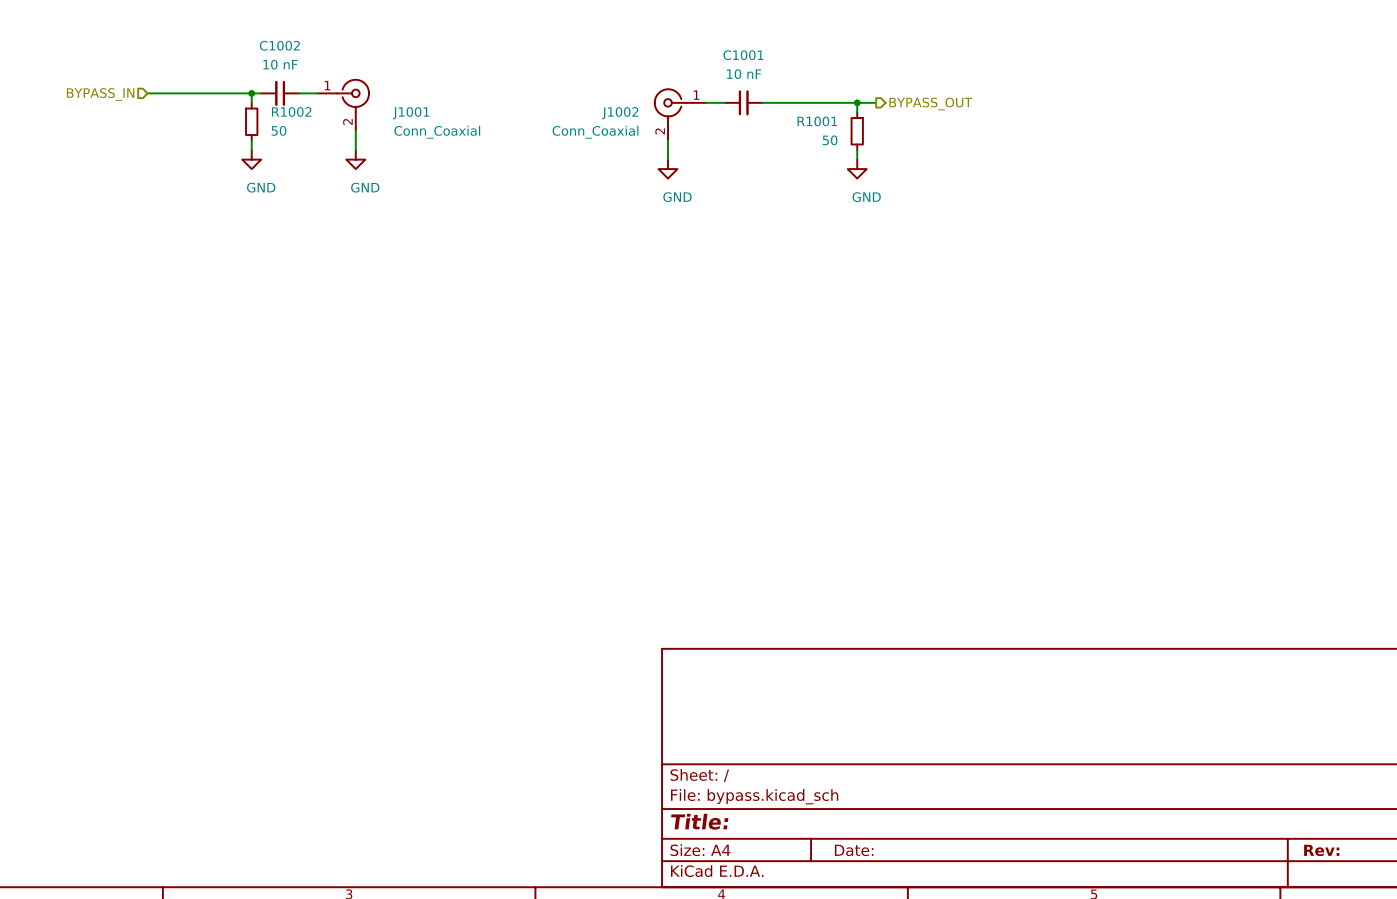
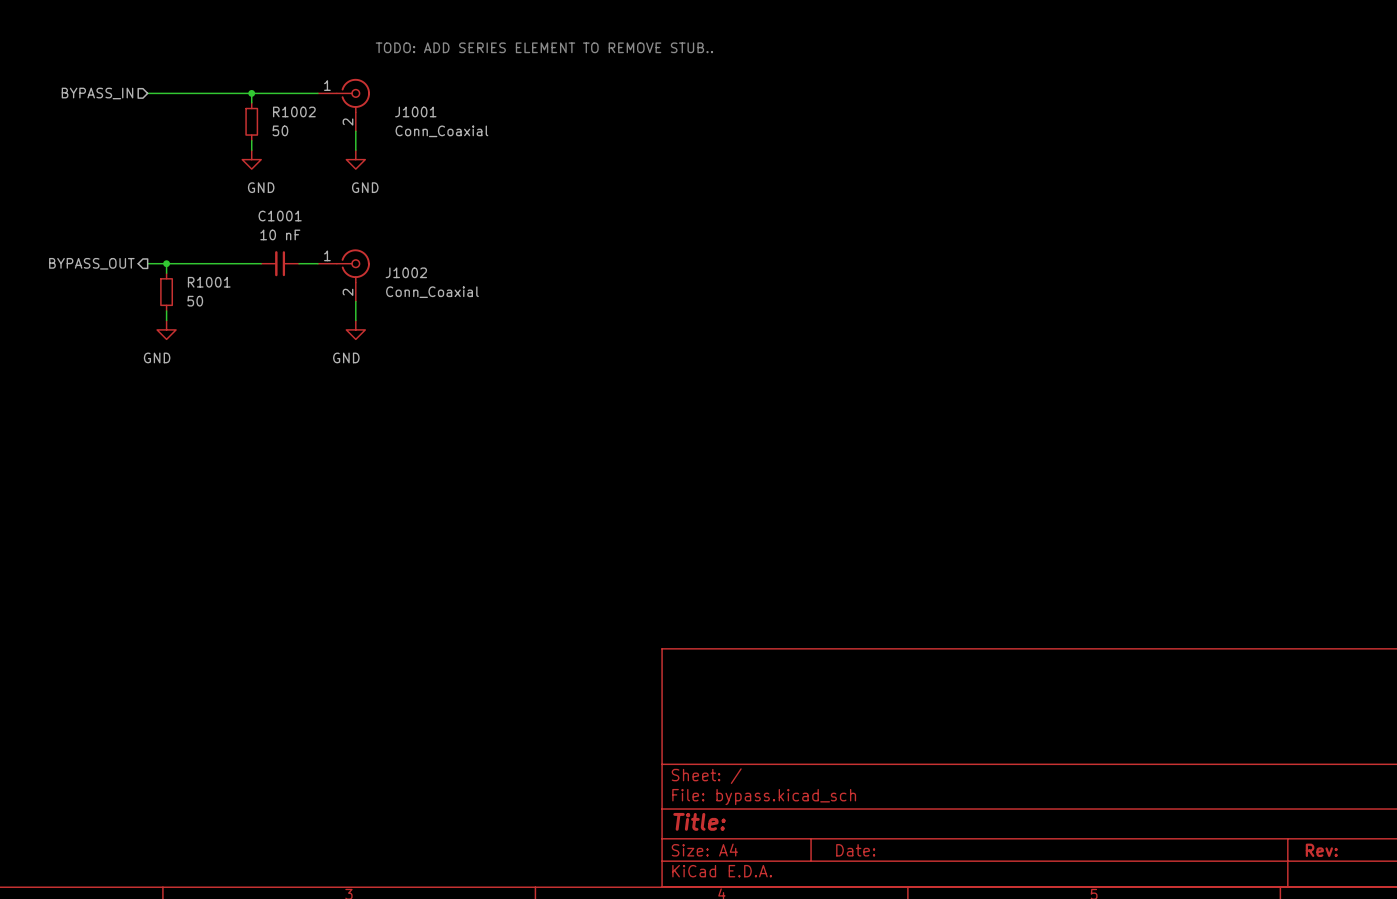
text: none -> TODO: ADD SERIES ELEMENT TO REMOVE STUB.. (544, 47)
J1002 symbol: [653, 88, 706, 141] -> [317, 249, 370, 302]
C1002: 10 nF (280, 93) -> none
wire: (705, 102) (724, 102) -> none
C1001 rotation: 0° (743, 102) -> 180° (280, 263)
C1001 position: (743, 102) -> (280, 263)
wire: (762, 102) (876, 102) -> none
wire: (857, 102) (857, 112) -> none
junction: (857, 102) -> none
hierarchical label: BYPASS_OUT (930, 103) -> none
J1002 name position: J1002 (620, 113) -> J1002 (406, 272)
R1001 name position: R1001 (817, 121) -> R1001 (209, 282)
R1001 position: (857, 131) -> (166, 292)
J1002 value position: Conn_Coaxial (595, 132) -> Conn_Coaxial (432, 292)
wire: (668, 140) (668, 159) -> none
R1001 value position: 50 (830, 140) -> 50 (195, 301)
wire: (857, 150) (857, 159) -> none
power symbol: GND (668, 169) -> none
power symbol: GND (857, 169) -> none
wire: none -> (147, 263) (261, 263)
wire: none -> (166, 263) (166, 273)
junction: none -> (166, 263)
wire: none -> (299, 263) (317, 263)
hierarchical label: none -> BYPASS_OUT (91, 263)
wire: none -> (355, 301) (355, 320)
wire: none -> (166, 311) (166, 320)
power symbol: none -> GND (166, 329)
power symbol: none -> GND (355, 329)

